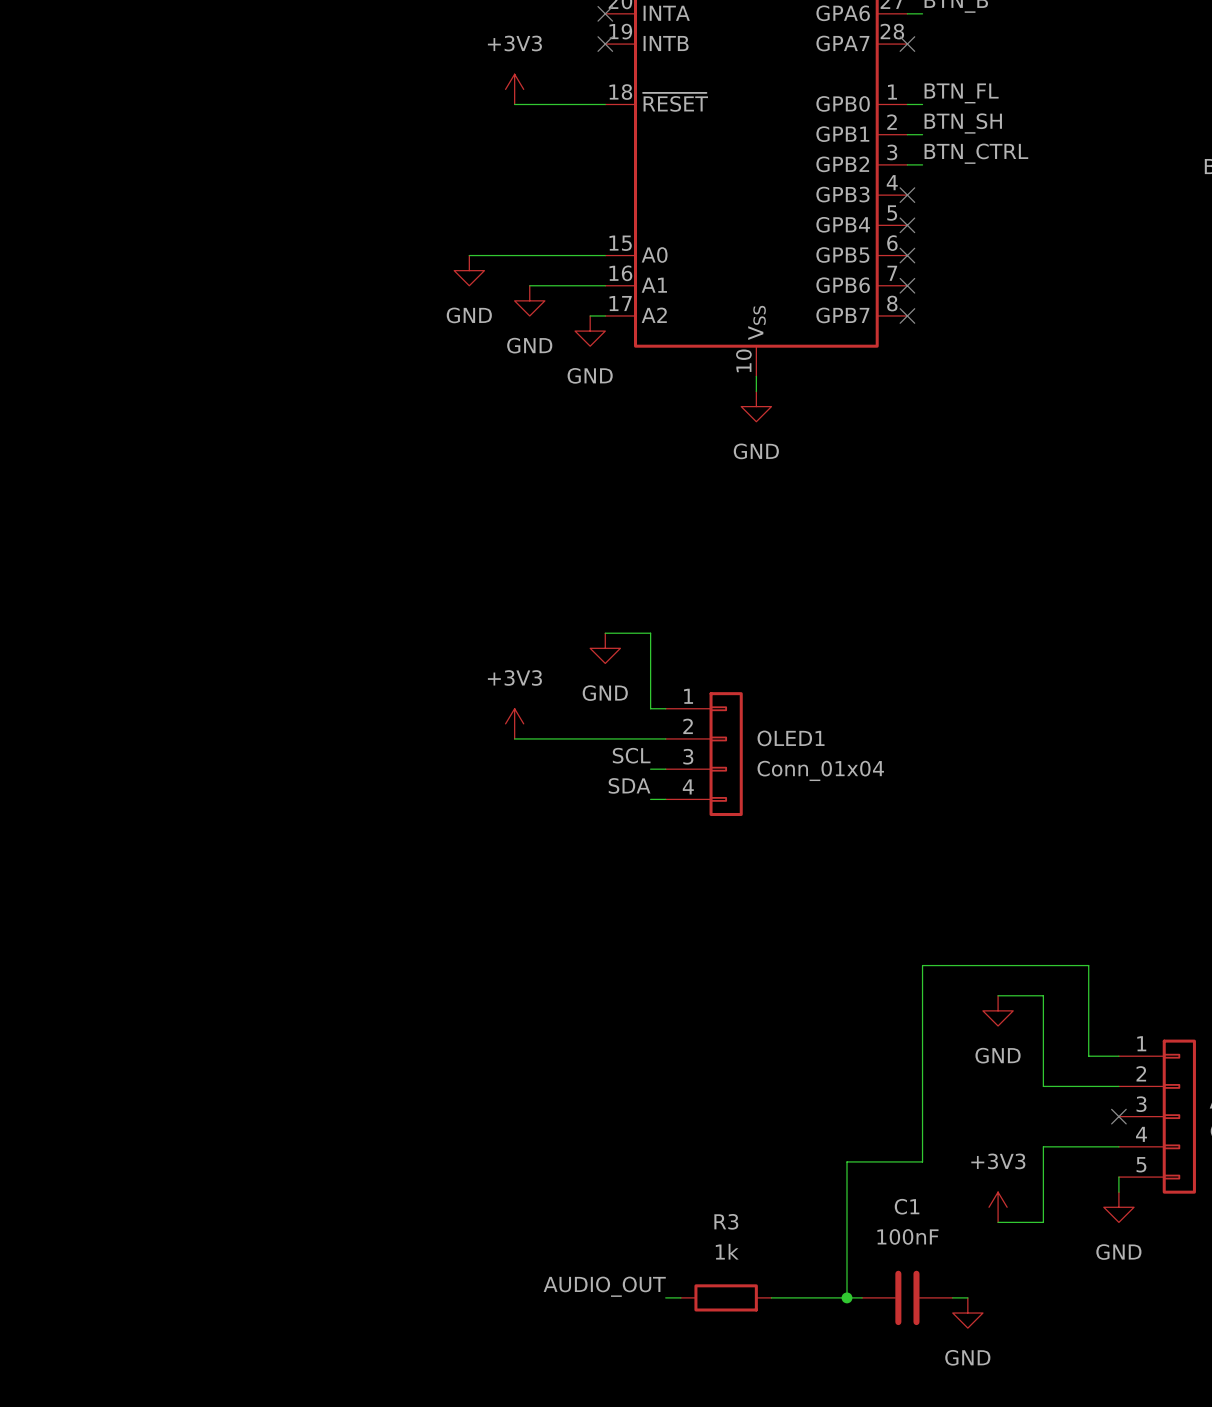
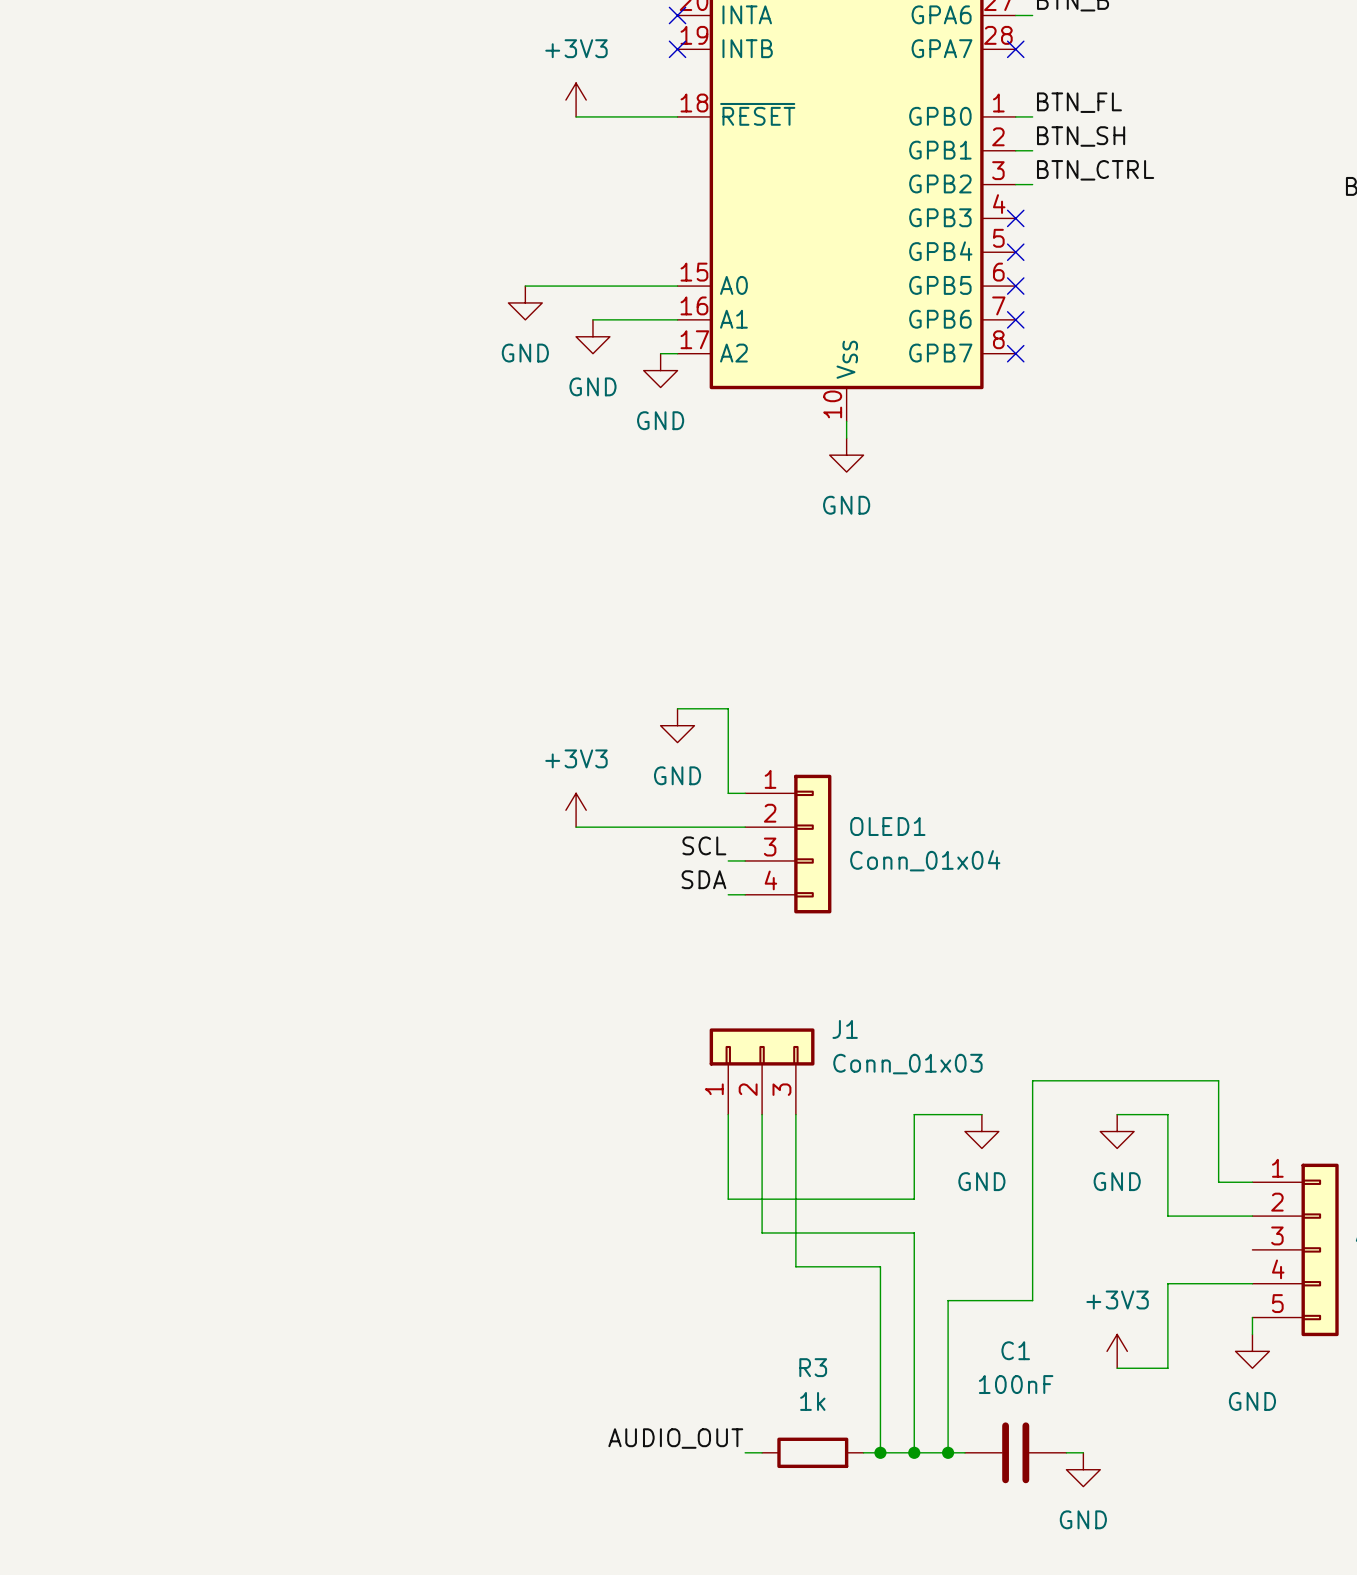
J1: none -> Conn_01x03 (762, 1071)
wire: none -> (728, 1114) (728, 1199) (914, 1199) (914, 1114) (981, 1114)
wire: none -> (762, 1114) (762, 1232) (914, 1232) (914, 1452)
wire: none -> (795, 1114) (795, 1266) (880, 1266) (880, 1452)
power symbol: none -> GND (981, 1131)
no-connect mark: (1118, 1116) -> none
junction: none -> (880, 1452)
junction: none -> (914, 1452)

